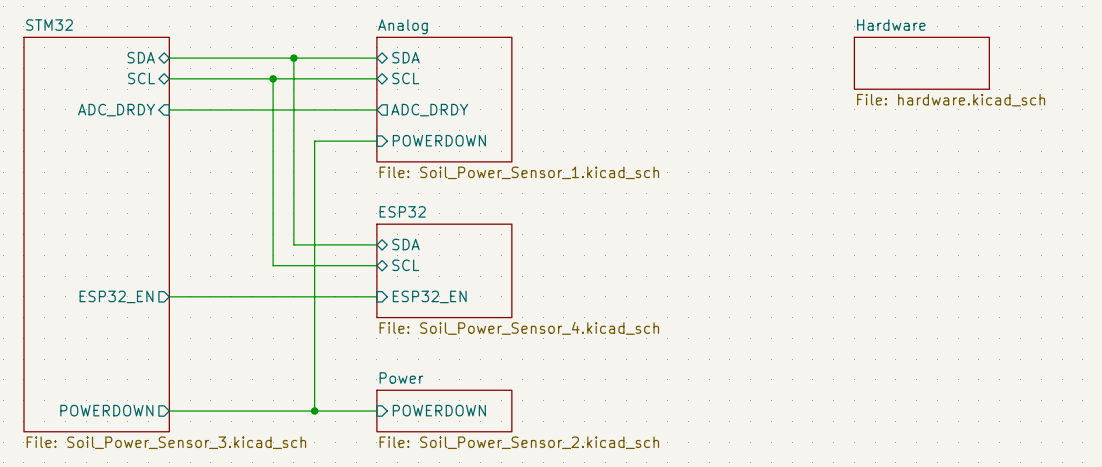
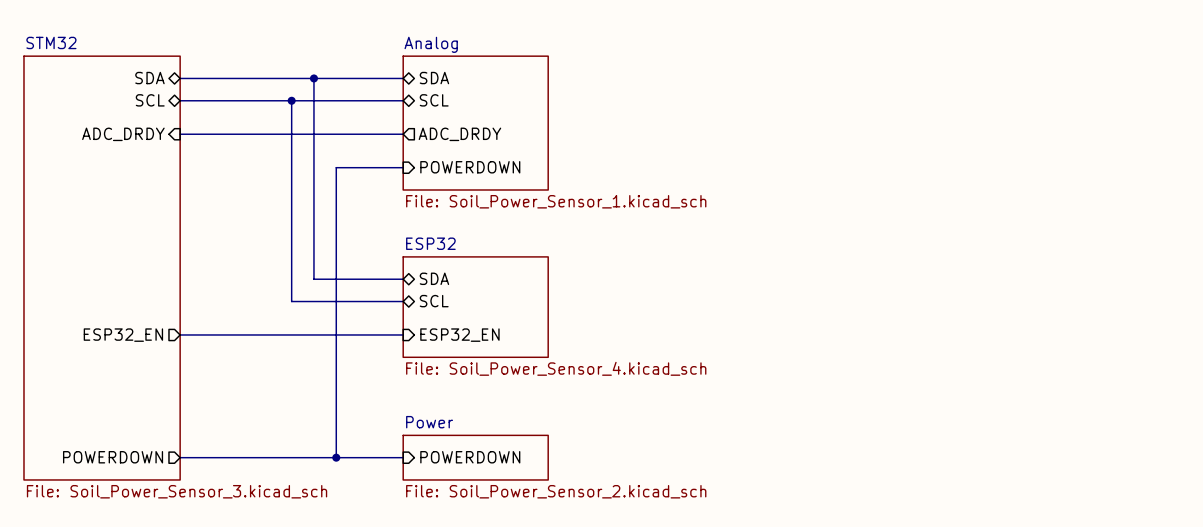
sheet Hardware: File: hardware.kicad_sch (921, 63) -> none

